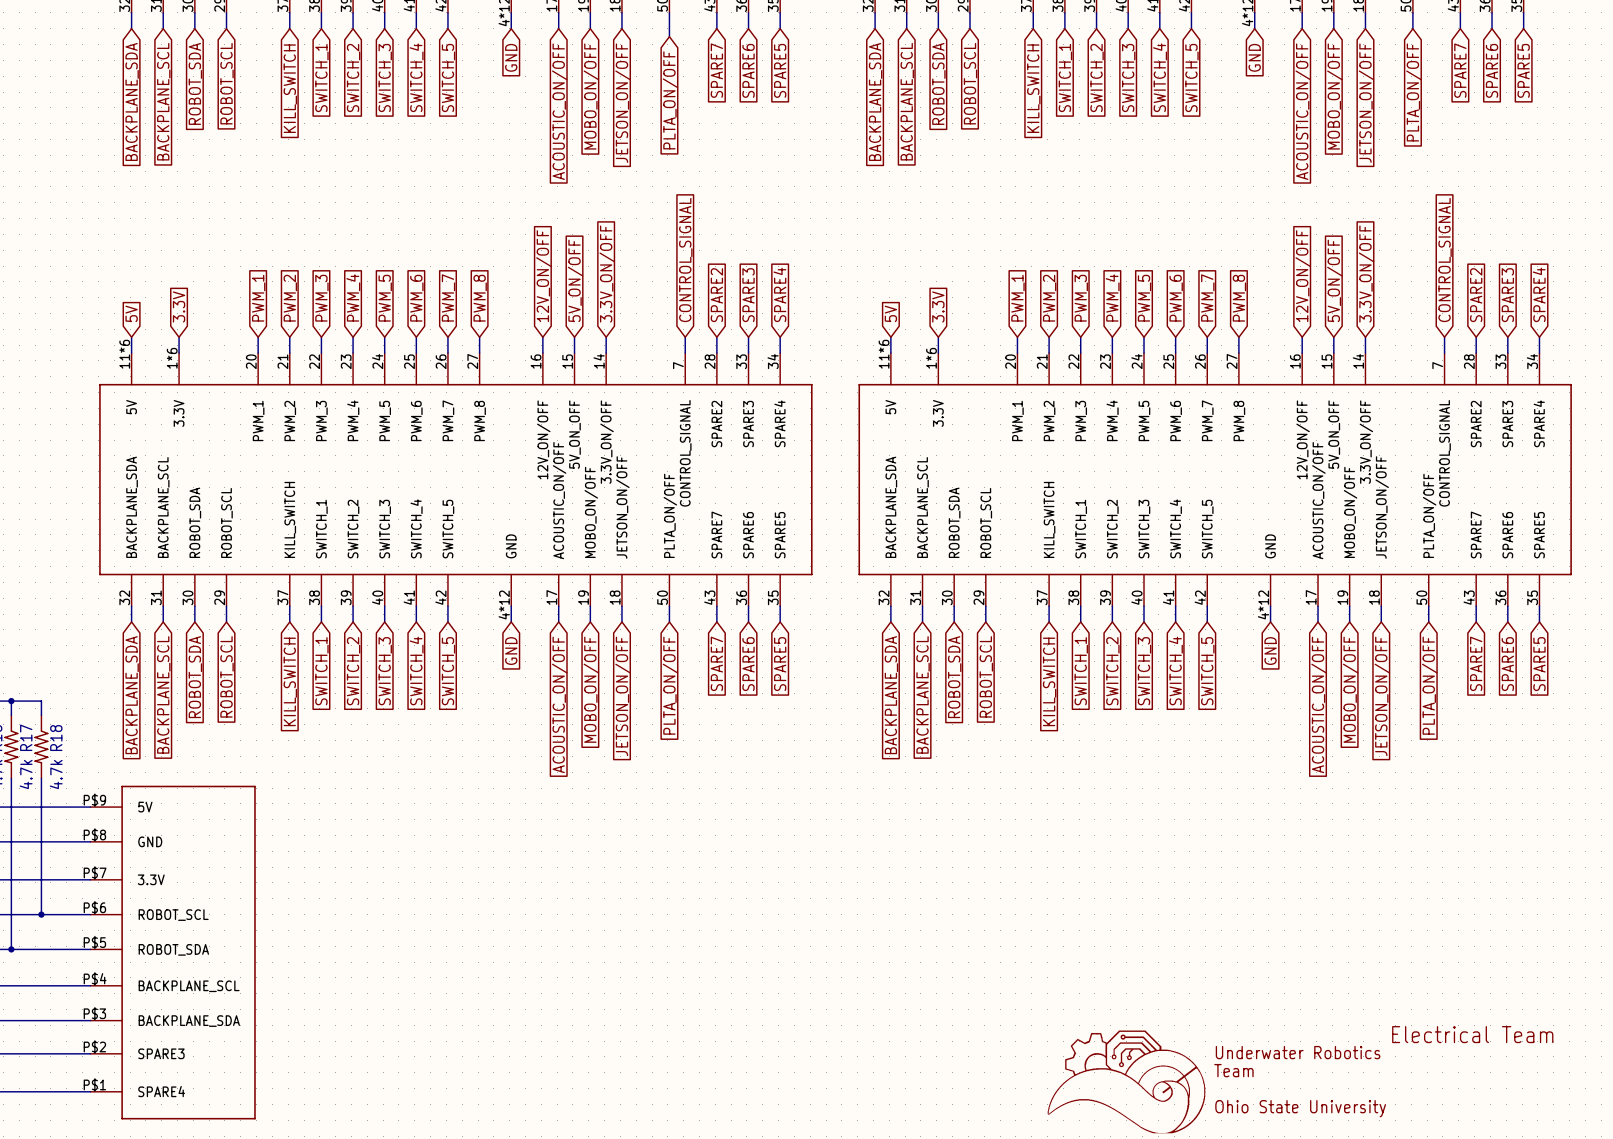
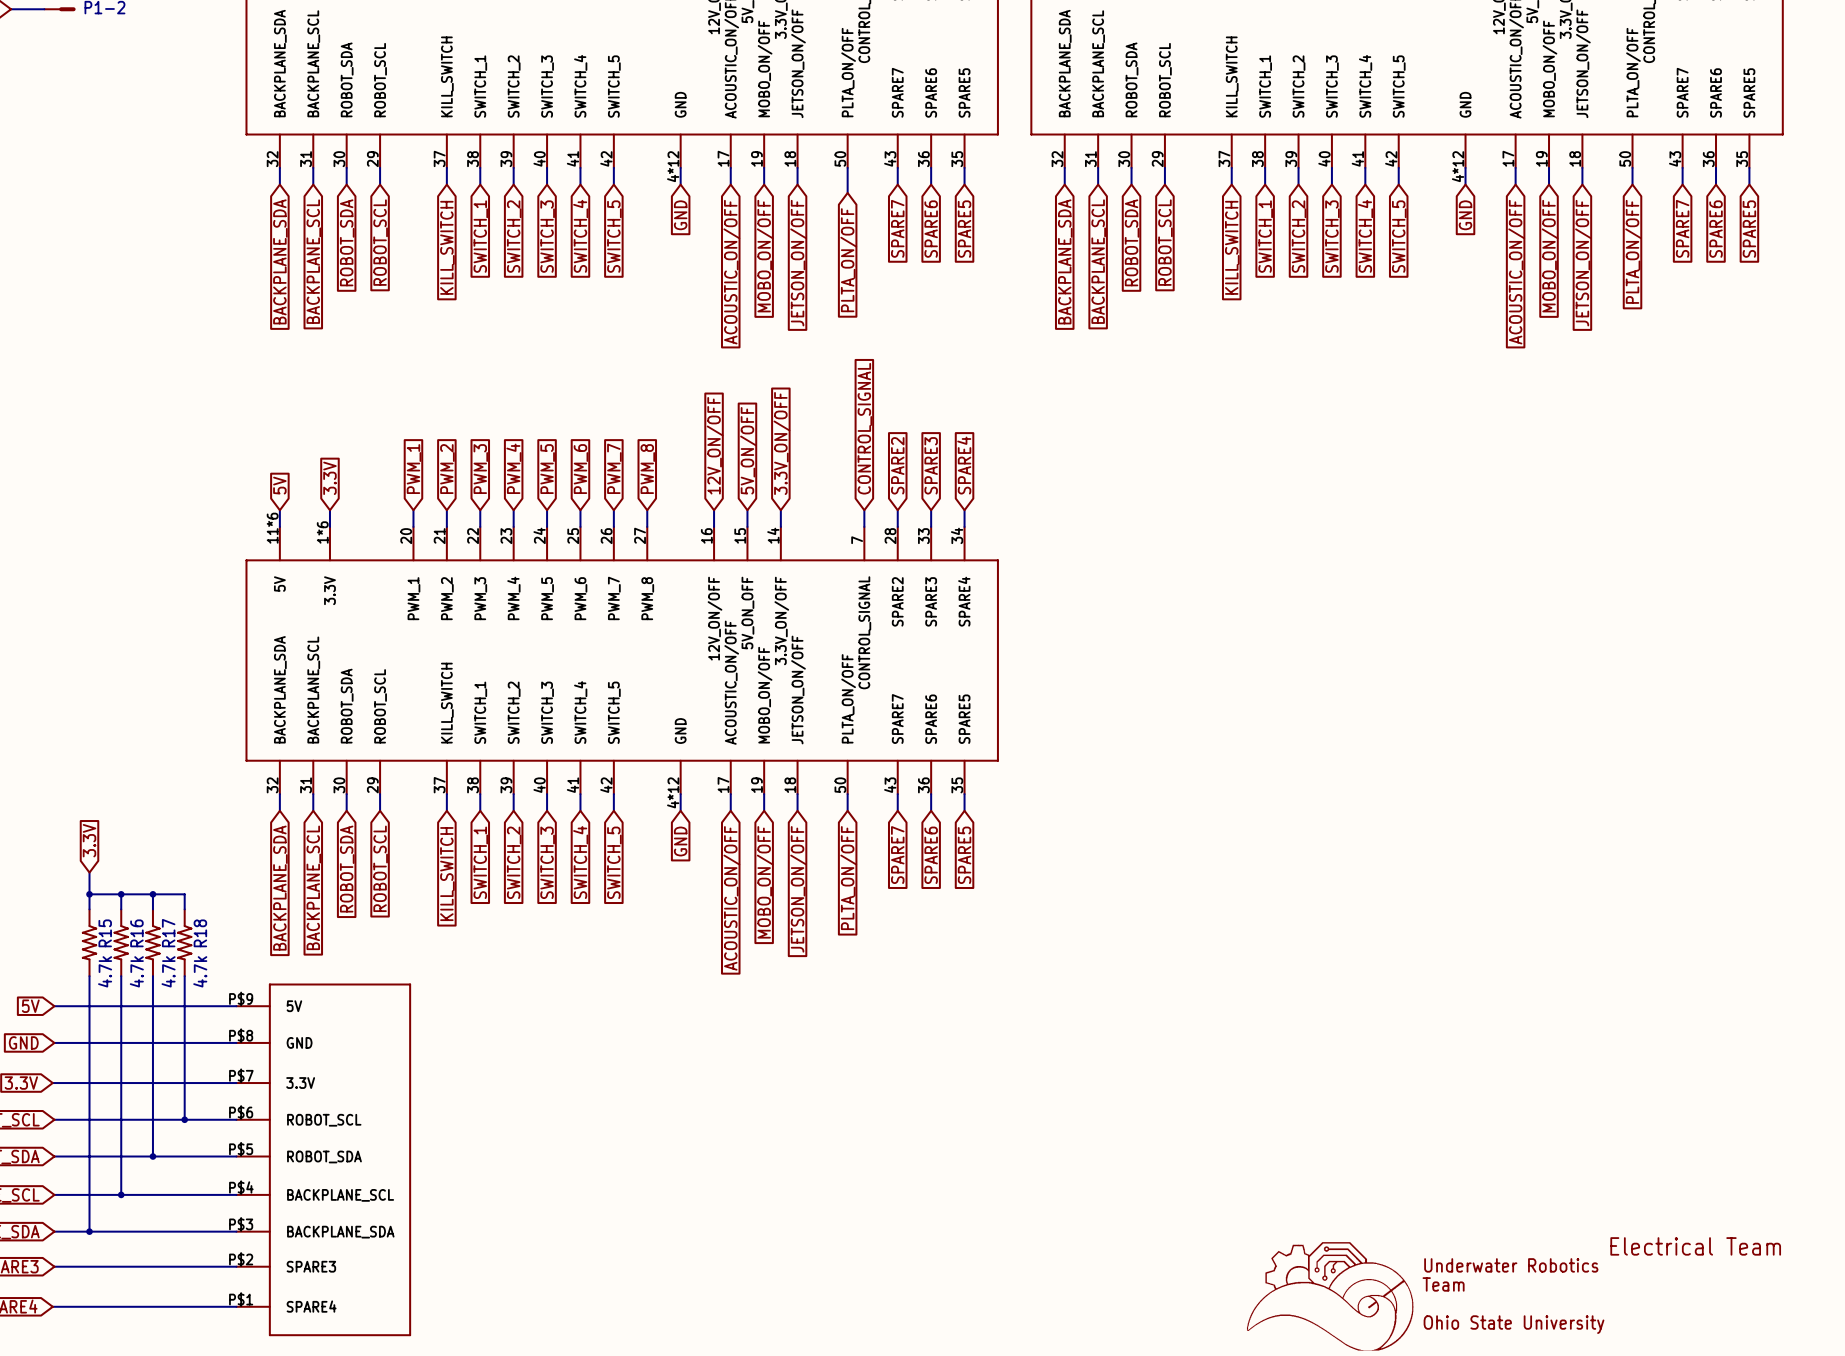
global label: CONTROL_SIGNAL (1445, 260) -> none
global label: 3.3V_ON/OFF (1366, 274) -> none
global label: 12V_ON/OFF (1303, 276) -> none
global label: 5V_ON/OFF (1334, 280) -> none
global label: SPARE4 (1539, 294) -> none
global label: SPARE2 (1476, 295) -> none
global label: SPARE3 (1507, 295) -> none
global label: PWM_4 (1112, 297) -> none
global label: PWM_7 (1207, 297) -> none
global label: PWM_1 (1017, 298) -> none
global label: PWM_2 (1049, 298) -> none
global label: PWM_3 (1081, 298) -> none
global label: PWM_5 (1144, 298) -> none
global label: PWM_6 (1176, 298) -> none
global label: PWM_8 (1239, 298) -> none
global label: 3.3V (938, 306) -> none
global label: 5V (890, 313) -> none
wire: (890, 337) (890, 353) -> none
wire: (938, 337) (938, 353) -> none
wire: (1017, 337) (1017, 353) -> none
wire: (1049, 337) (1049, 353) -> none
wire: (1080, 337) (1080, 353) -> none
wire: (1112, 337) (1112, 353) -> none
wire: (1144, 337) (1144, 353) -> none
wire: (1175, 337) (1175, 353) -> none
wire: (1207, 337) (1207, 353) -> none
wire: (1238, 337) (1238, 353) -> none
wire: (1302, 337) (1302, 353) -> none
wire: (1333, 337) (1333, 353) -> none
wire: (1365, 337) (1365, 353) -> none
wire: (1444, 337) (1444, 353) -> none
wire: (1476, 337) (1476, 353) -> none
wire: (1507, 337) (1507, 353) -> none
wire: (1539, 337) (1539, 353) -> none
part: (1215, 479) -> none
wire: (890, 606) (890, 621) -> none
wire: (922, 606) (922, 621) -> none
wire: (954, 606) (954, 621) -> none
wire: (985, 606) (985, 621) -> none
wire: (1049, 606) (1049, 621) -> none
wire: (1080, 606) (1080, 621) -> none
wire: (1112, 606) (1112, 621) -> none
wire: (1144, 606) (1144, 621) -> none
wire: (1175, 606) (1175, 621) -> none
wire: (1207, 606) (1207, 621) -> none
wire: (1270, 606) (1270, 621) -> none
wire: (1318, 606) (1318, 621) -> none
wire: (1349, 606) (1349, 621) -> none
wire: (1381, 606) (1381, 621) -> none
wire: (1428, 606) (1428, 621) -> none
wire: (1476, 606) (1476, 621) -> none
wire: (1507, 606) (1507, 621) -> none
wire: (1539, 606) (1539, 621) -> none
global label: GND (1270, 651) -> none
global label: SPARE7 (1476, 663) -> none
global label: SPARE6 (1507, 664) -> none
global label: SPARE5 (1539, 664) -> none
global label: SWITCH_4 (1175, 670) -> none
global label: SWITCH_1 (1081, 671) -> none
global label: SWITCH_2 (1112, 671) -> none
global label: SWITCH_3 (1144, 671) -> none
global label: SWITCH_5 (1207, 671) -> none
global label: ROBOT_SCL (986, 676) -> none
global label: ROBOT_SDA (954, 677) -> none
global label: KILL_SWITCH (1049, 681) -> none
global label: PLTA_ON/OFF (1429, 685) -> none
global label: MOBO_ON/OFF (1350, 689) -> none
global label: BACKPLANE_SCL (923, 694) -> none
global label: BACKPLANE_SDA (891, 695) -> none
global label: JETSON_ON/OFF (1382, 696) -> none
global label: ACOUSTIC_ON/OFF (1319, 704) -> none

